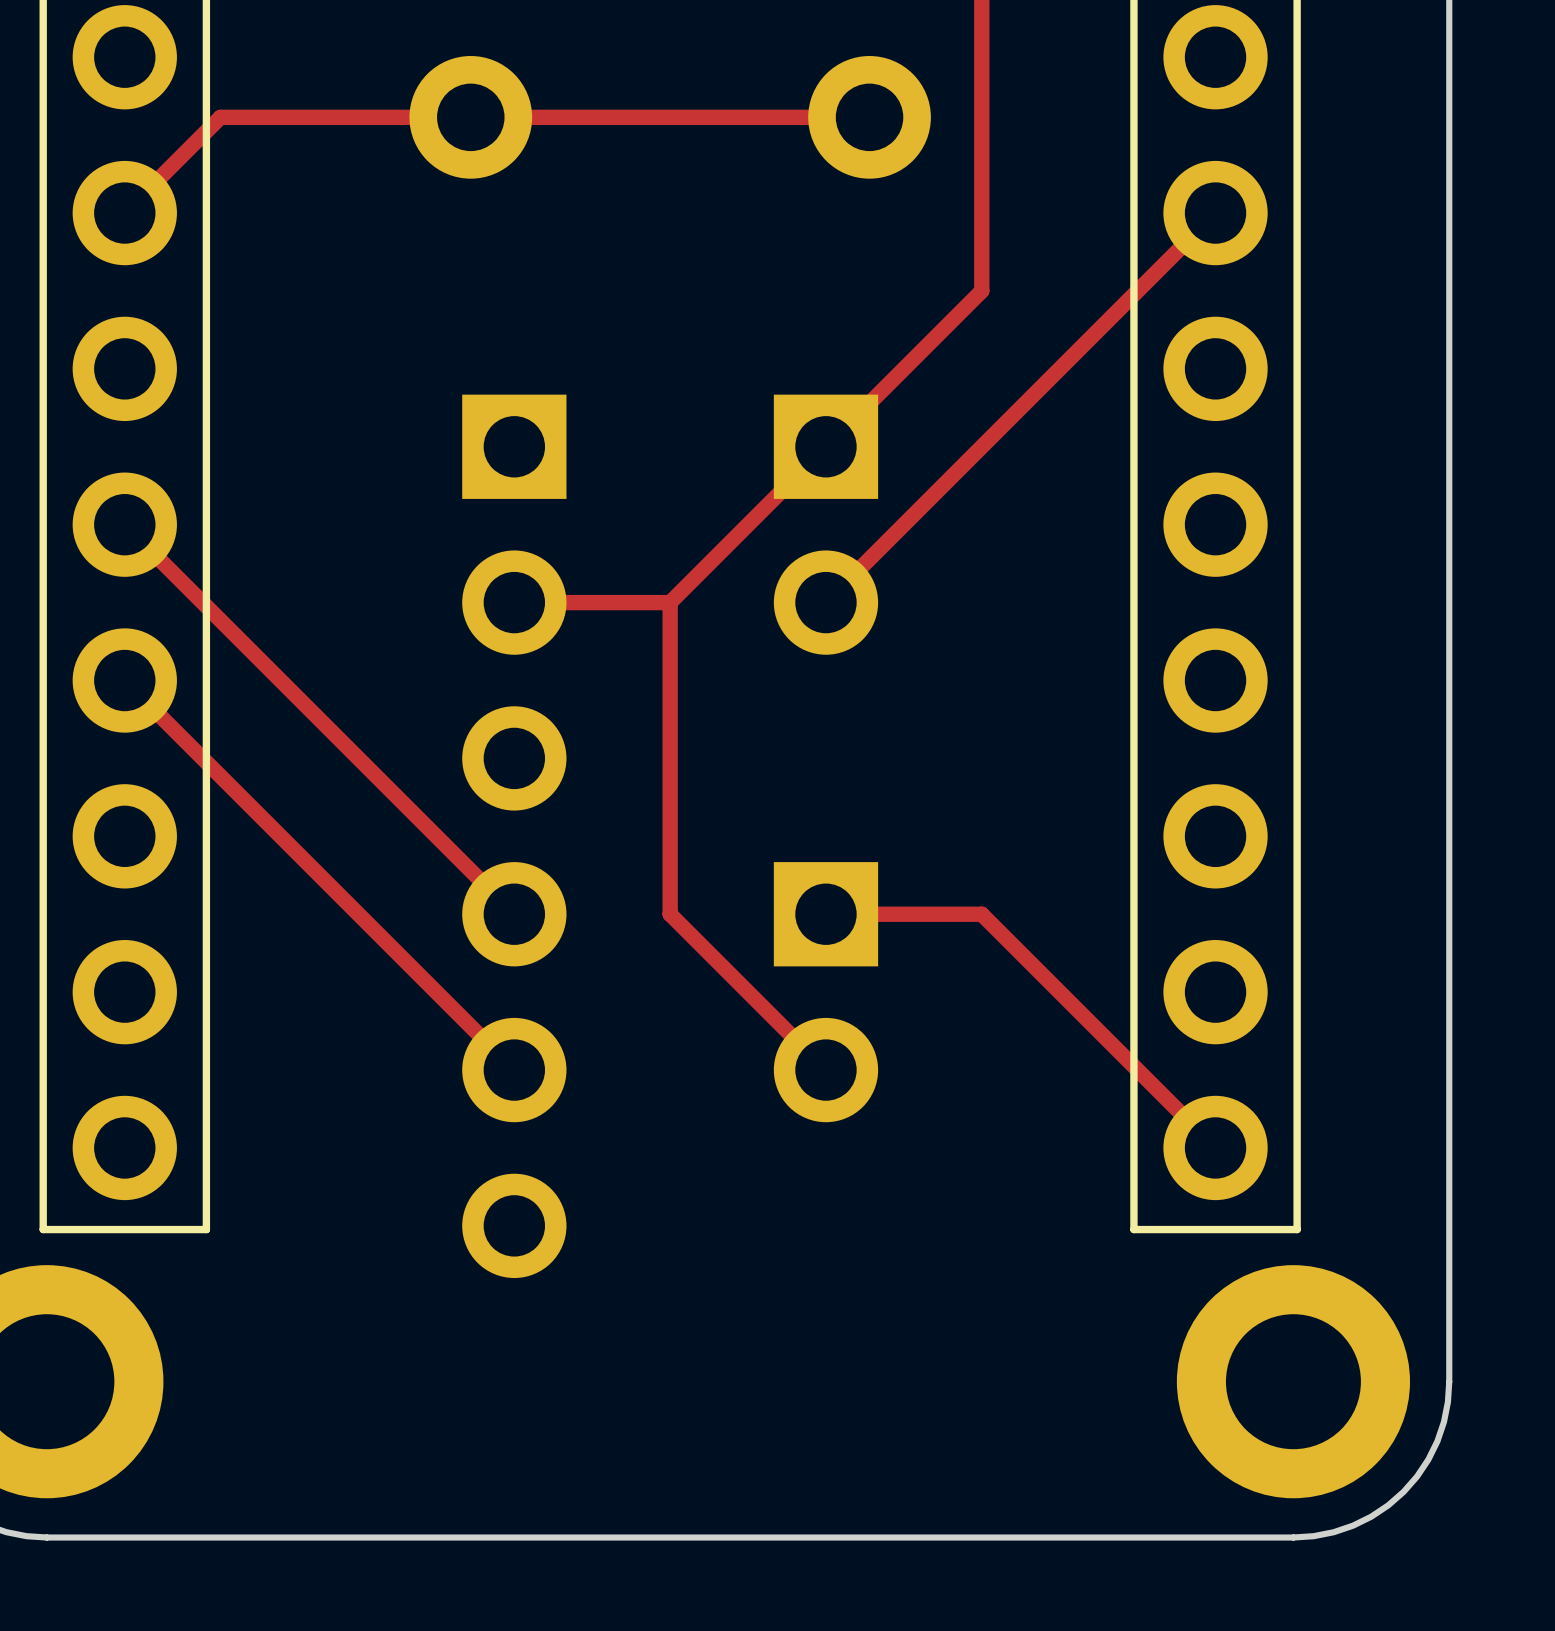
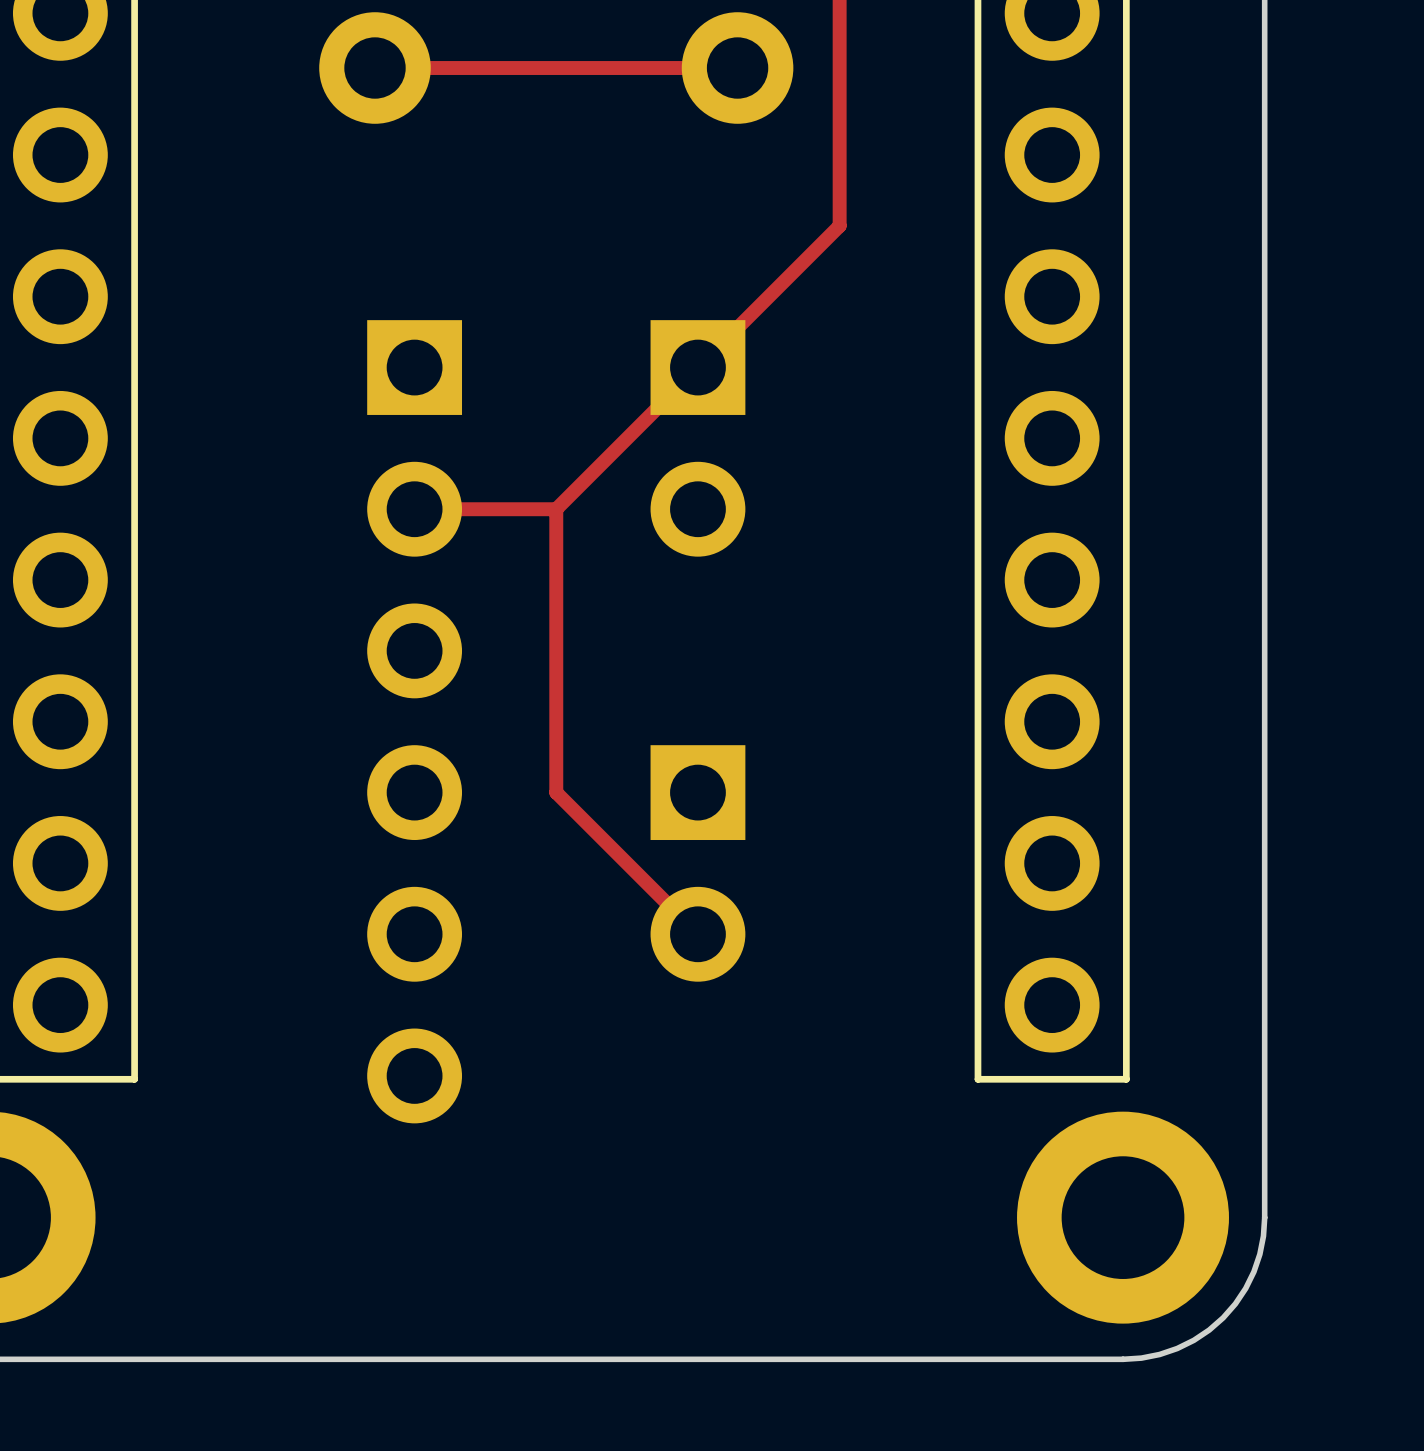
track: (470, 117) (220, 117) (124, 213) -> none
track: (1215, 213) (825, 602) -> none
track: (124, 524) (514, 914) -> none
track: (124, 680) (514, 1070) -> none
track: (825, 914) (981, 914) (1215, 1147) -> none

